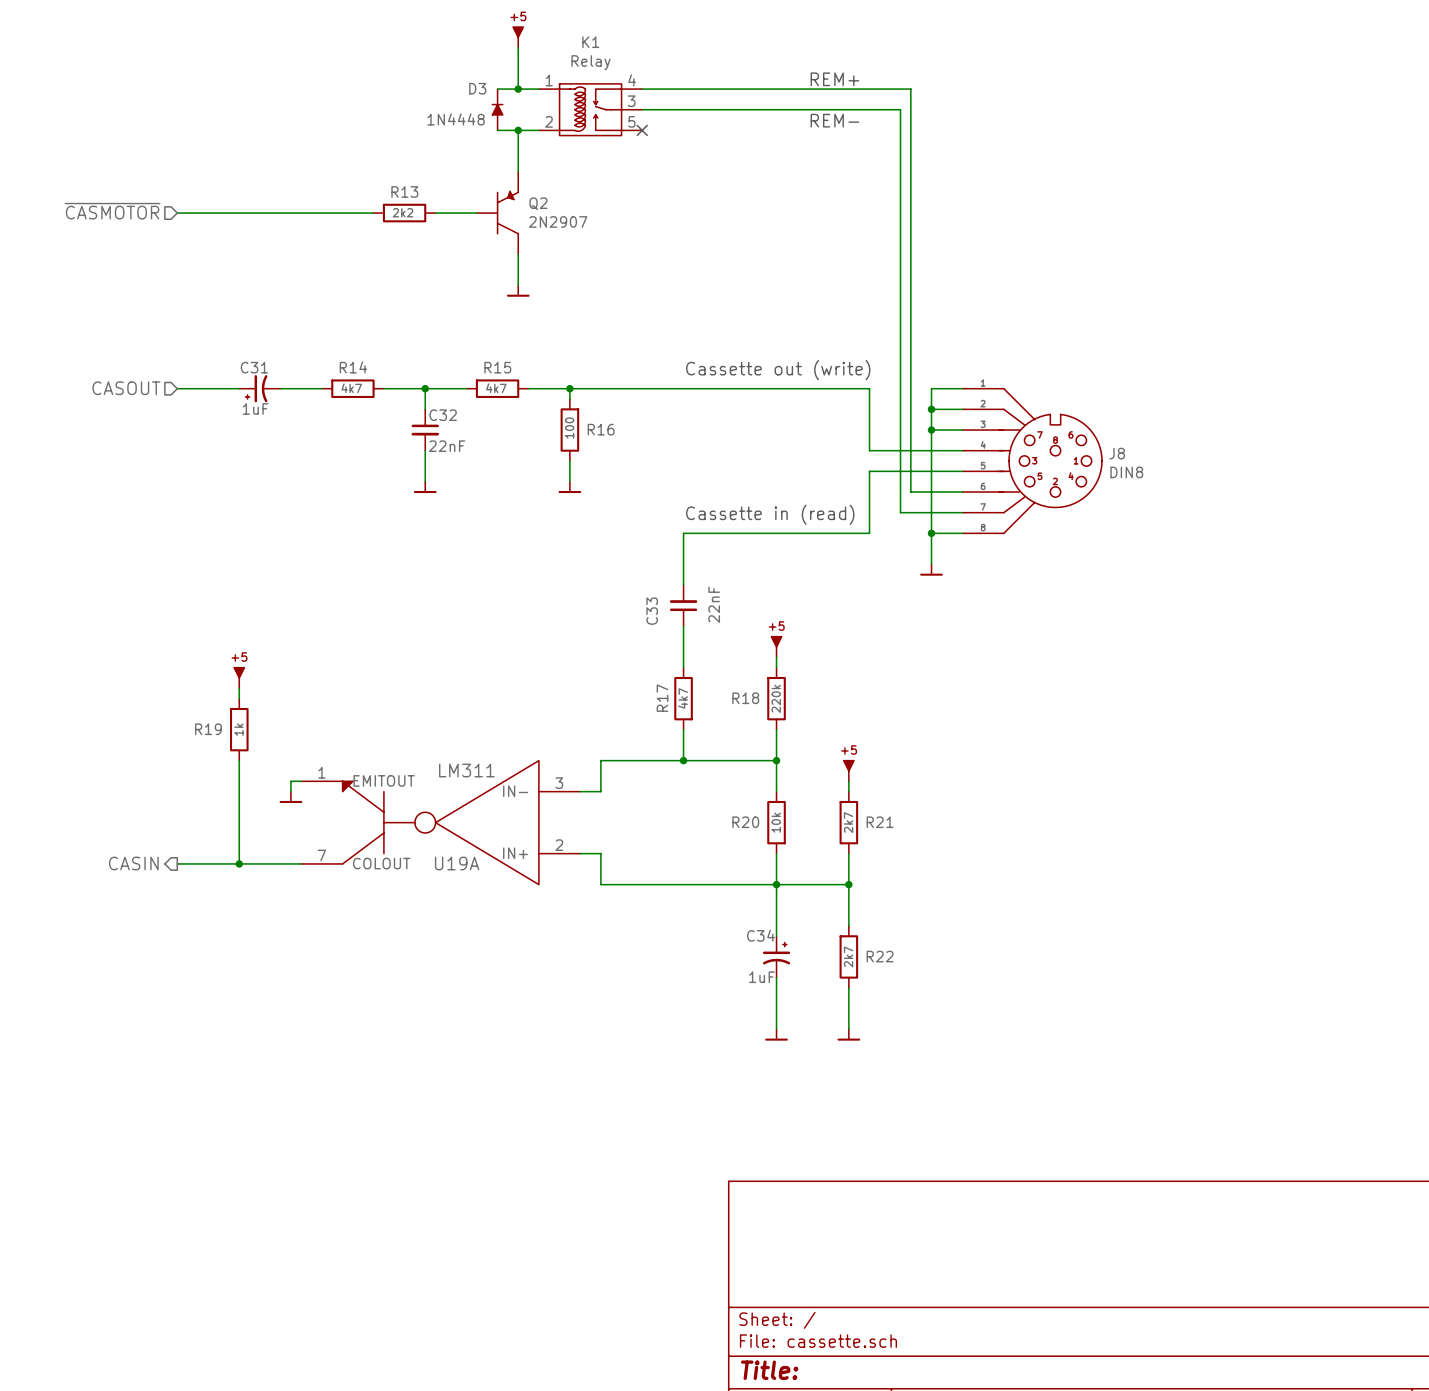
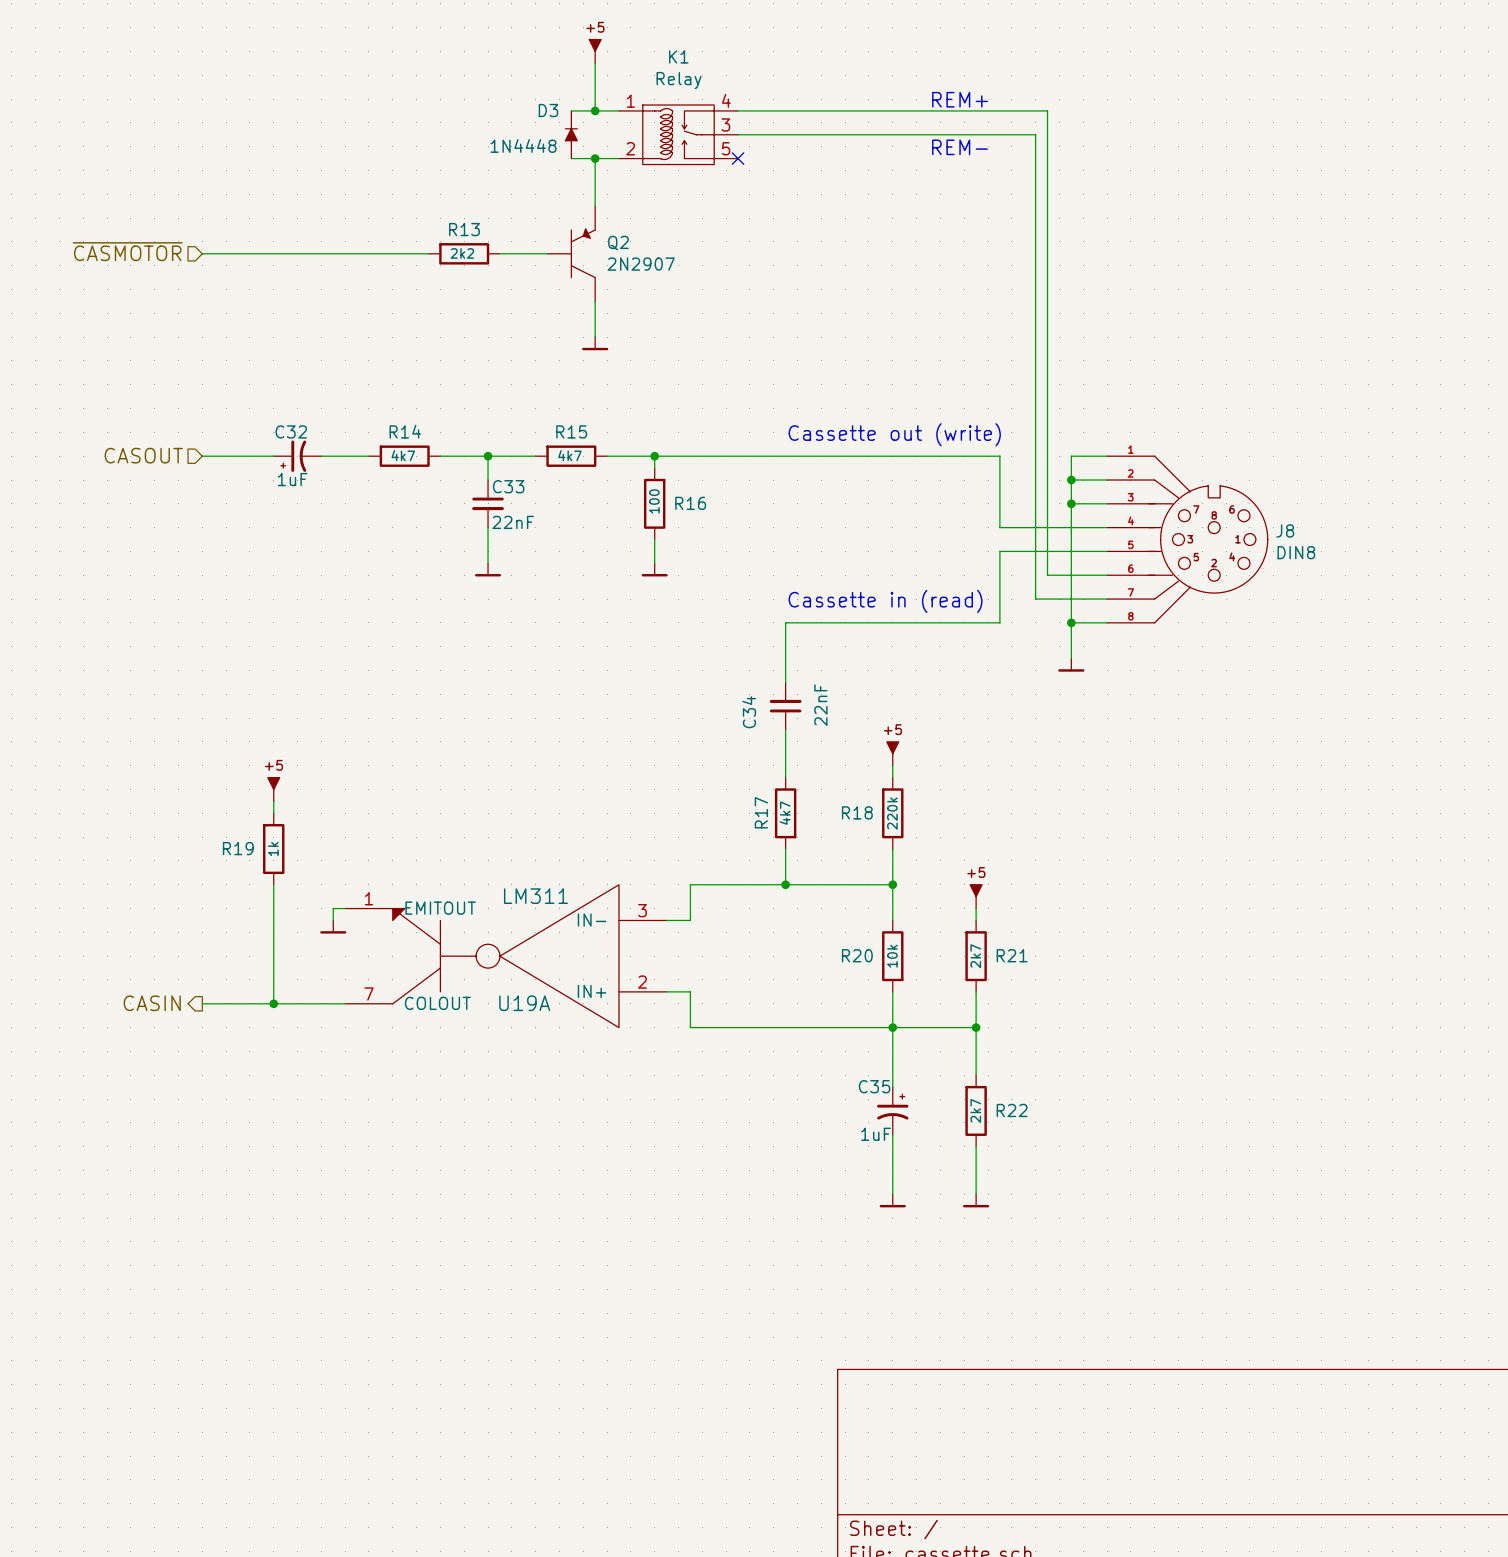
C31 name: C31 (254, 367) -> C32 (291, 431)
C32 name: C32 (443, 415) -> C33 (508, 486)
C33 name: C33 (652, 611) -> C34 (749, 712)
C34 name: C34 (760, 935) -> C35 (874, 1086)

